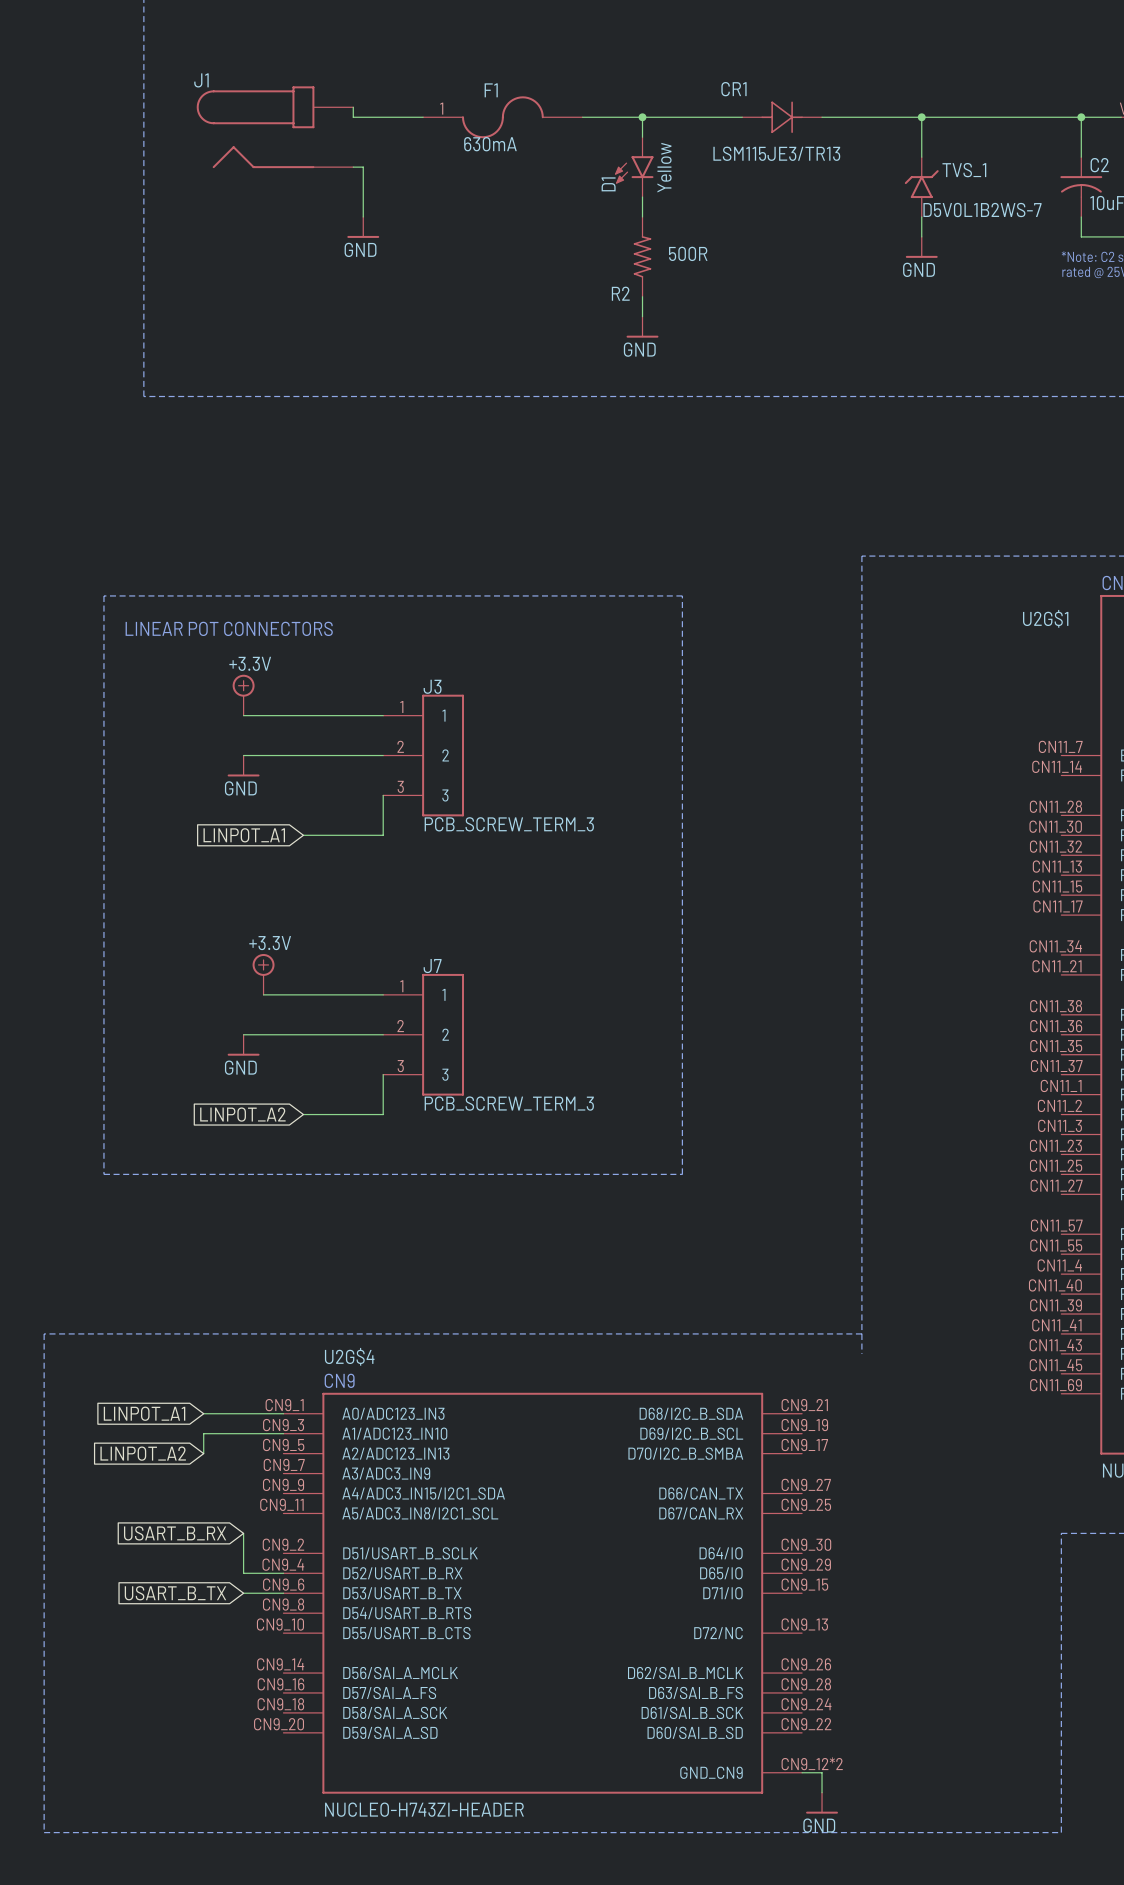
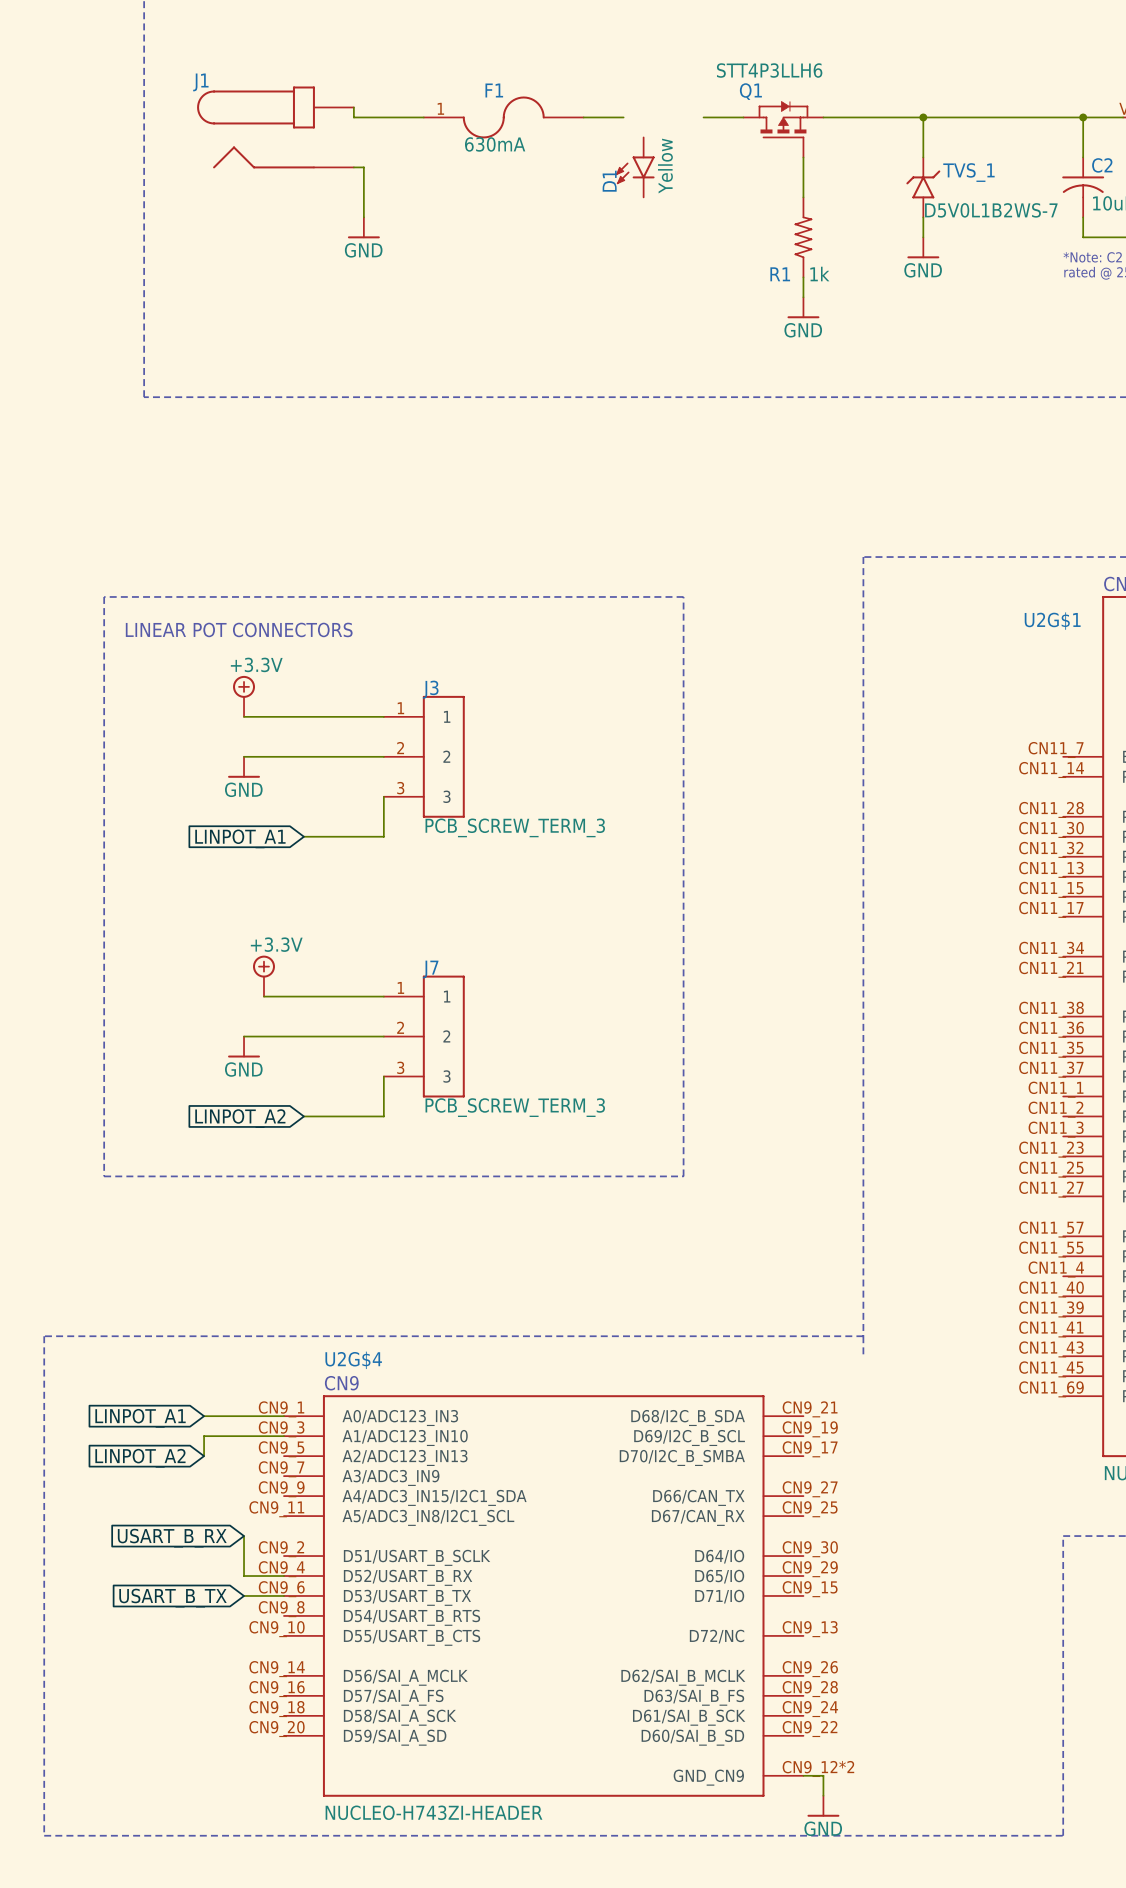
wire: (622, 117) (702, 117) -> none
wire: (642, 117) (642, 137) -> none
junction: (642, 117) -> none
CR1: LSM115JE3/TR13 (782, 117) -> none
Q1: none -> STT4P3LLH6 (783, 129)
wire: none -> (803, 157) (803, 197)
wire: (642, 197) (642, 216) -> none
R1: none -> 1k (803, 237)
R2: 500R (642, 256) -> none
wire: (642, 296) (642, 316) -> (803, 277) (803, 297)
power symbol position: GND (642, 327) -> GND (803, 307)

